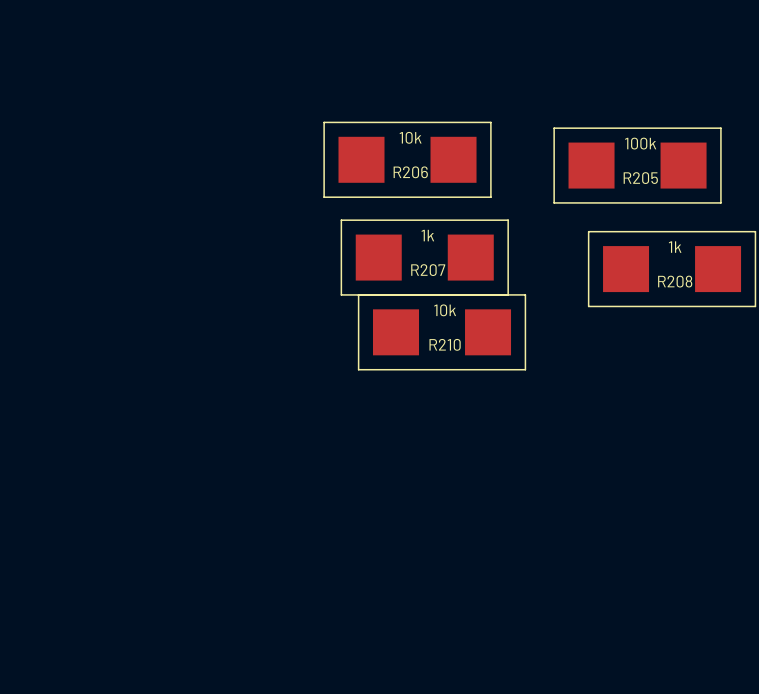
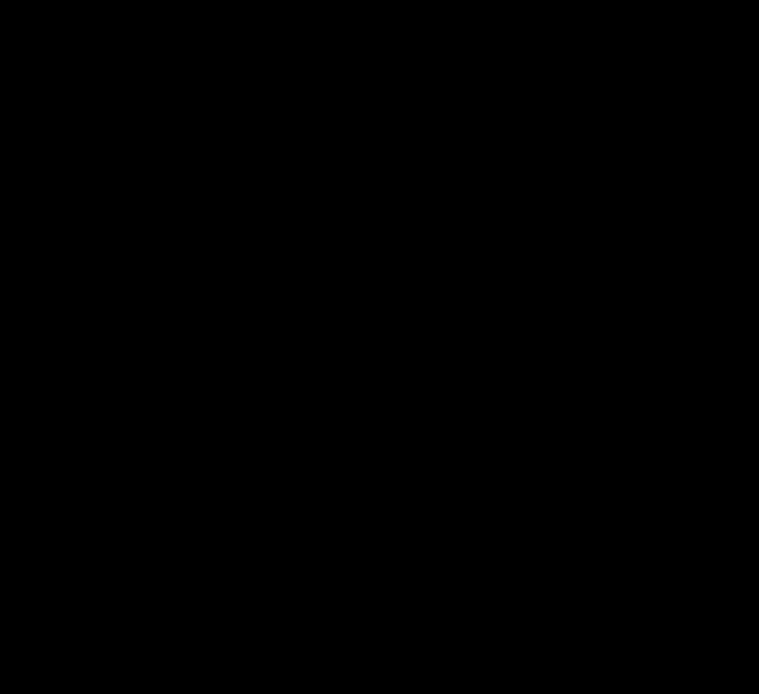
R206: 10k (407, 159) -> none
R205: 100k (637, 165) -> none
R207: 1k (424, 257) -> none
R208: 1k (672, 269) -> none
R210: 10k (442, 332) -> none

